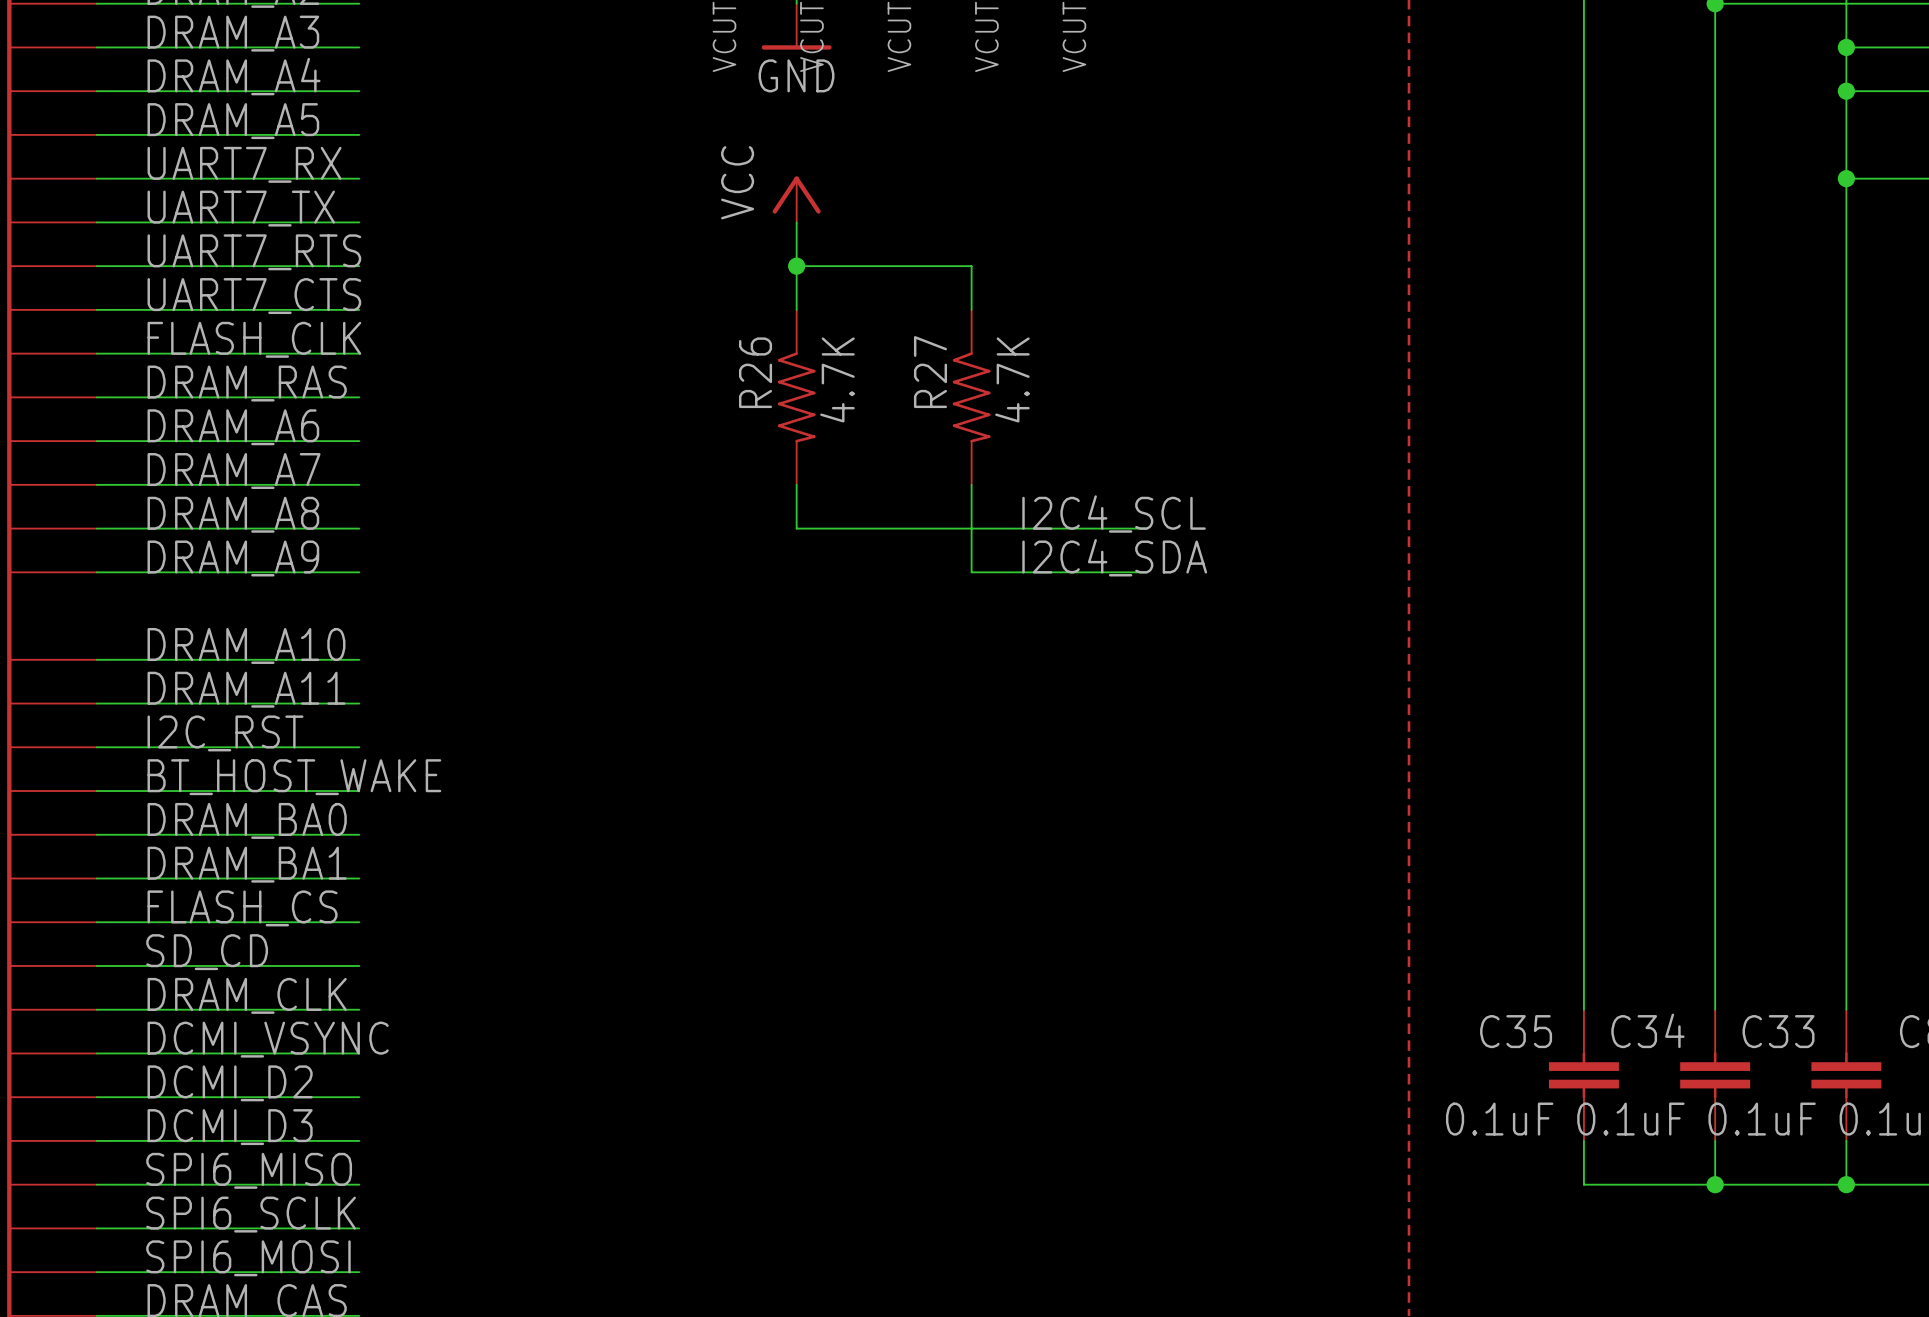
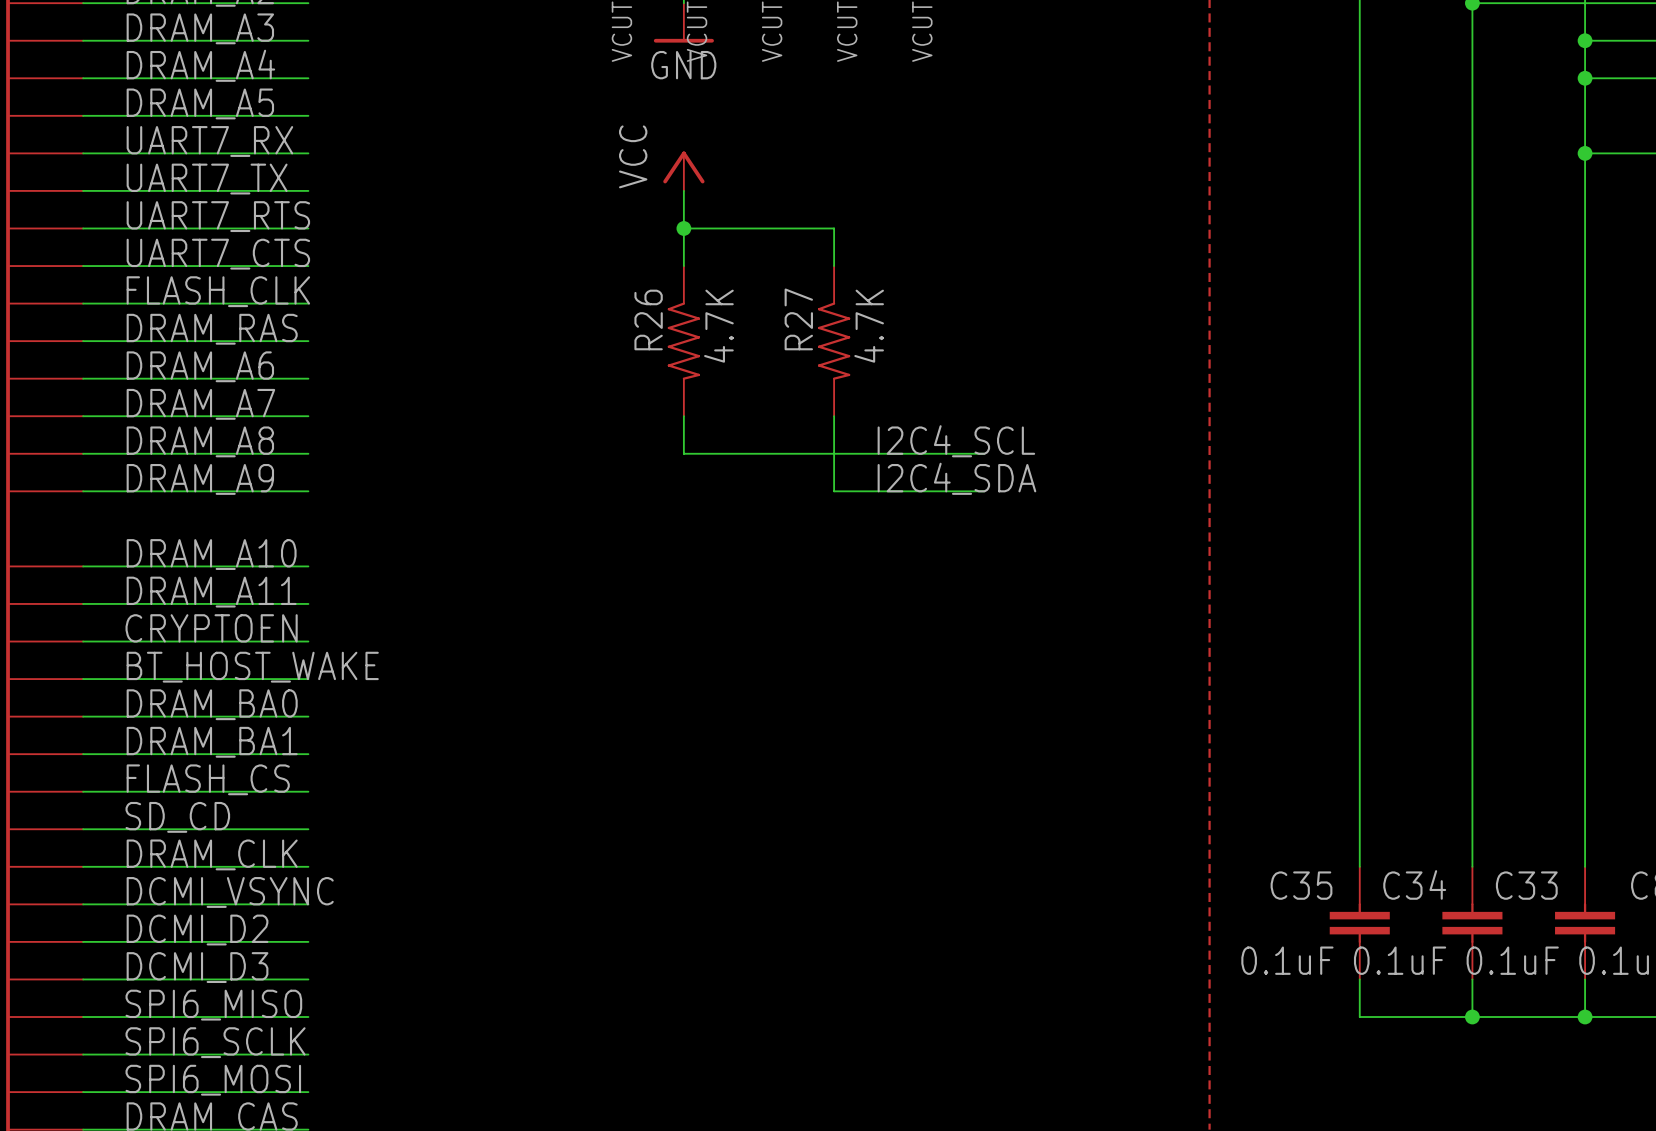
label: I2C_RST (225, 733) -> CRYPTOEN (211, 628)

